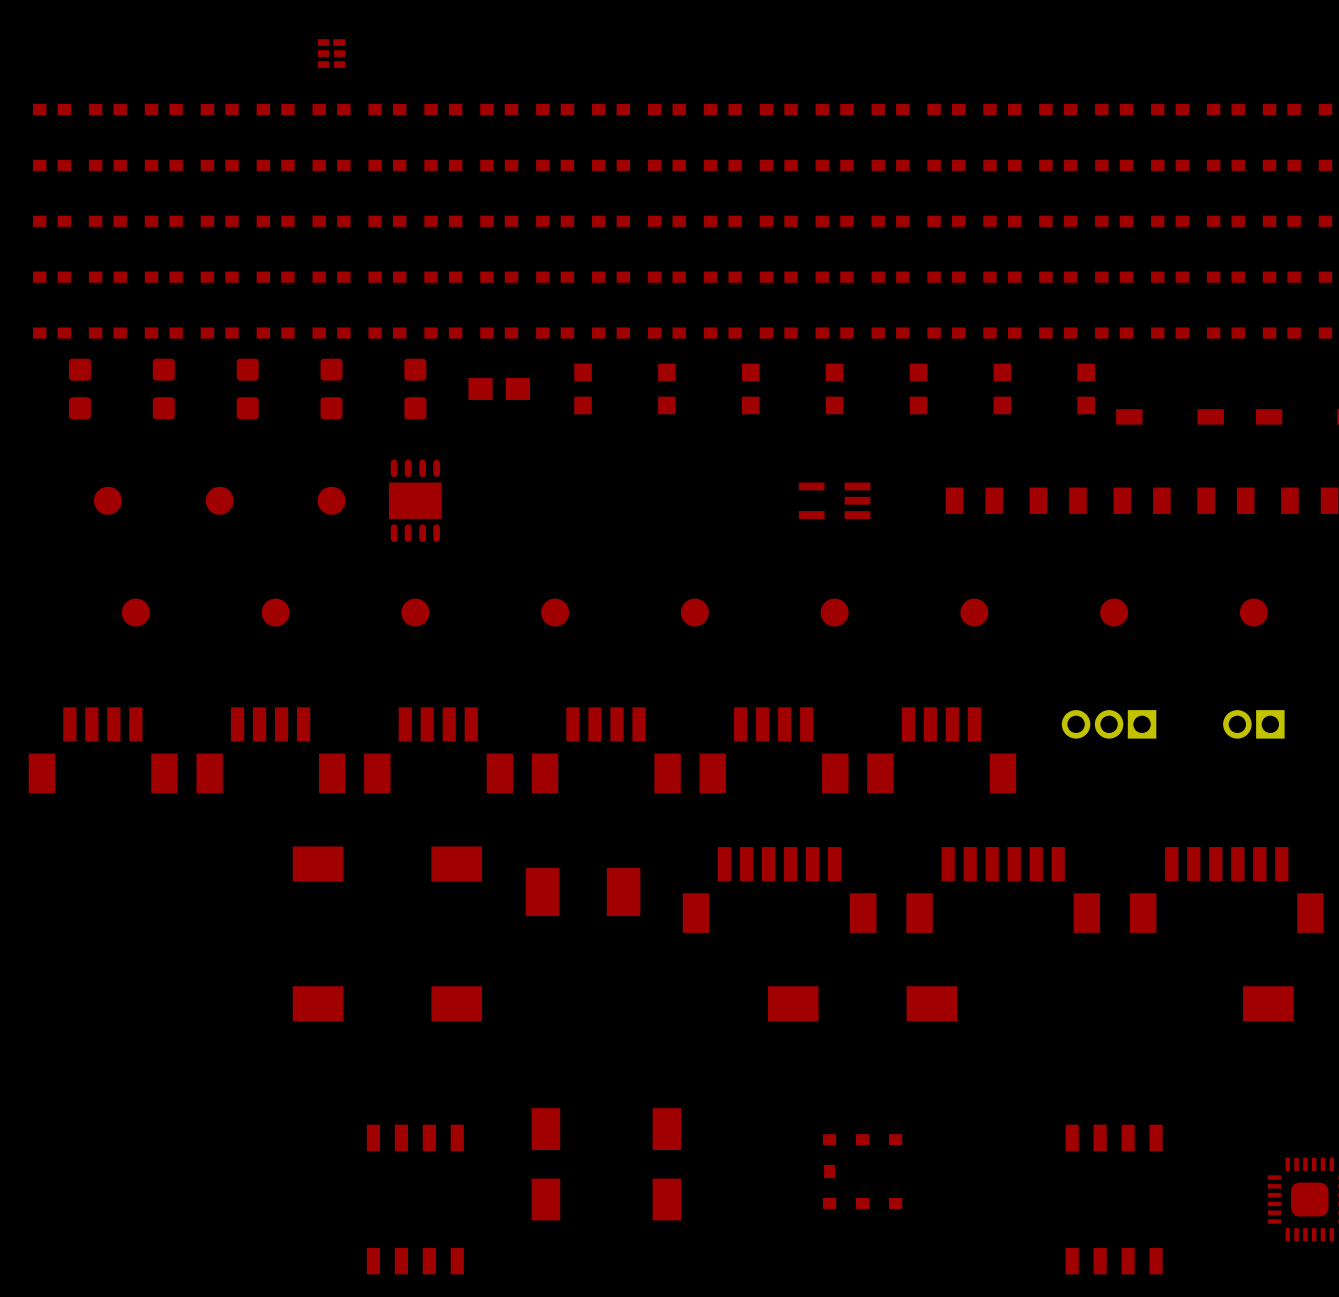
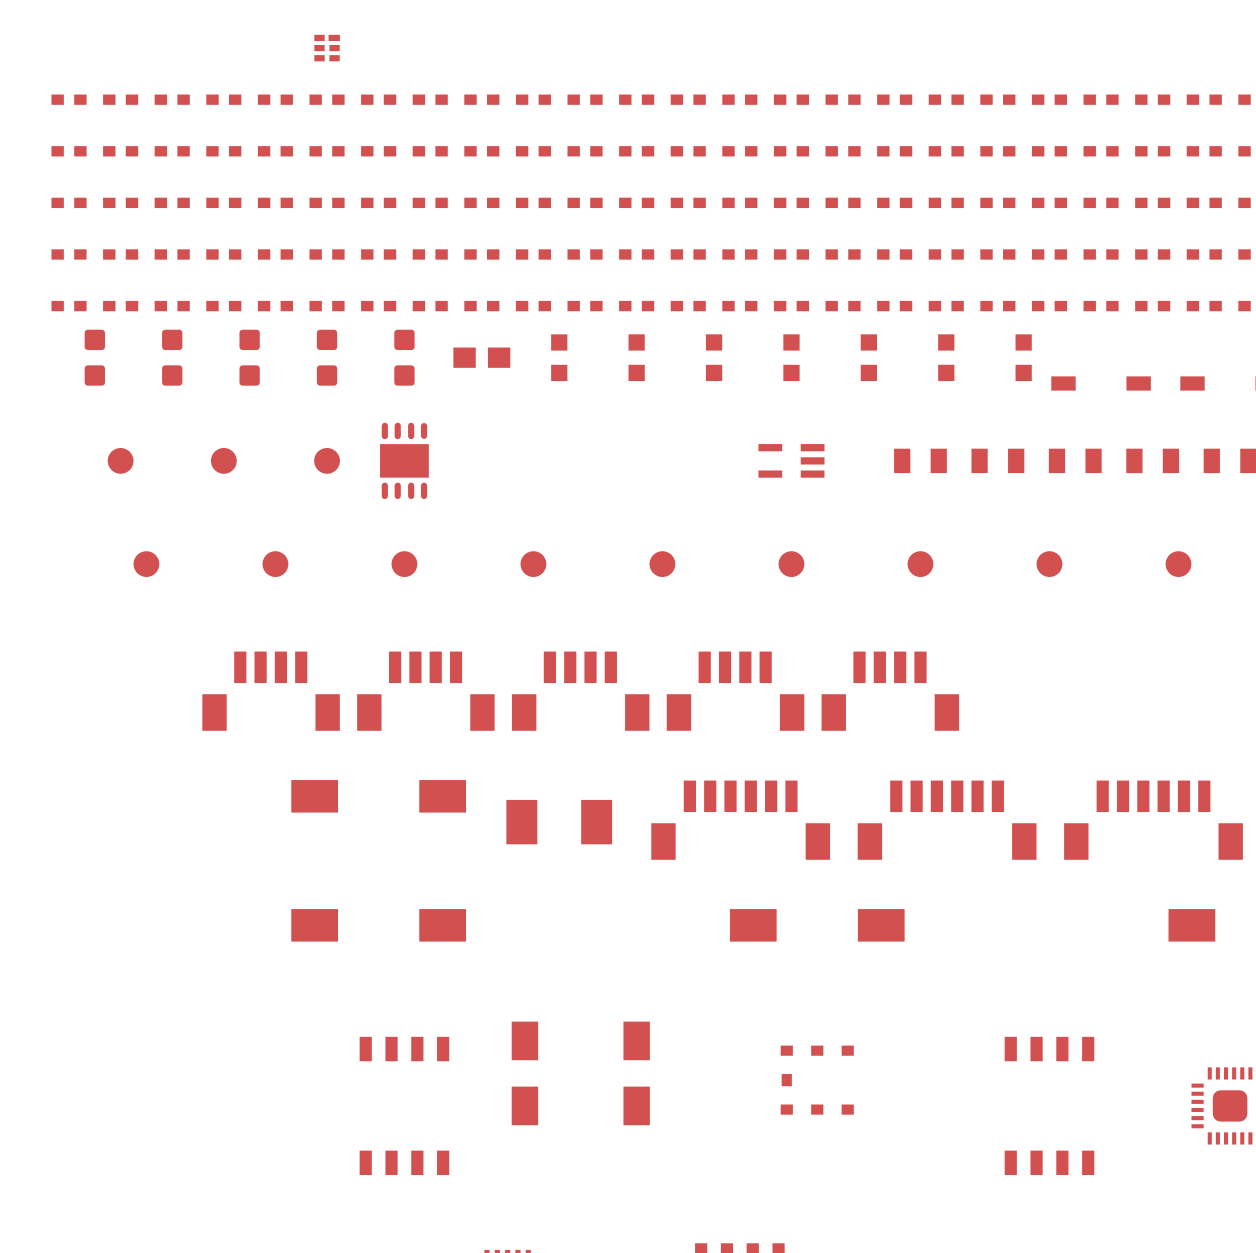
part: (1109, 724) -> none
part: (1253, 724) -> none
part: (103, 750) -> none

